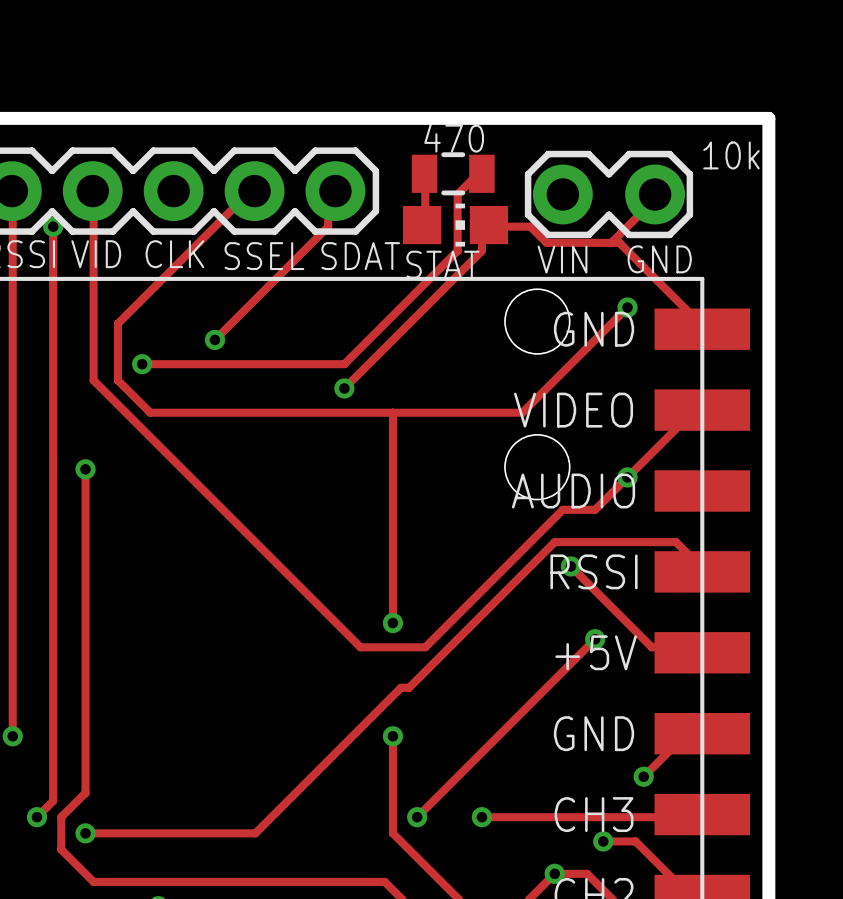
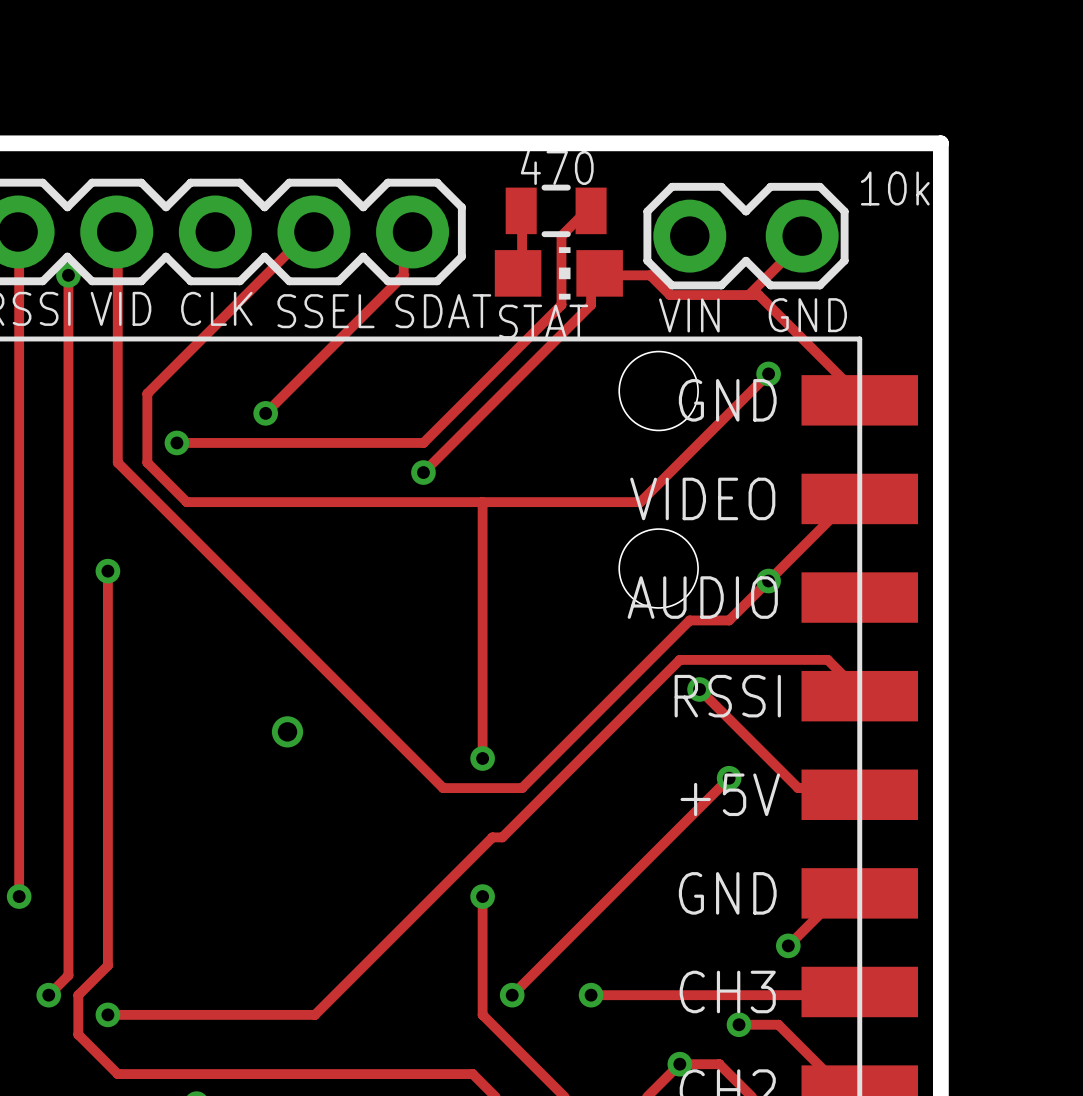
via: none -> (287, 731)

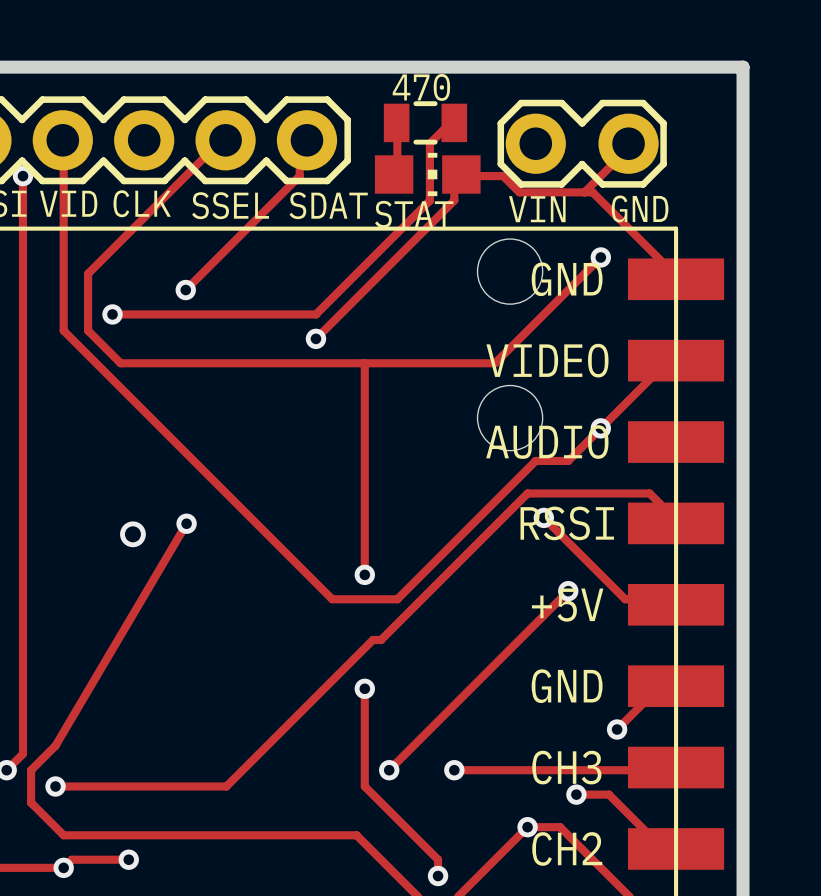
text: 10k (895, 188) -> none
track: (107, 571) (107, 965) -> (186, 523) (55, 745)
via position: (107, 571) -> (186, 523)
via position: (287, 731) -> (132, 534)

